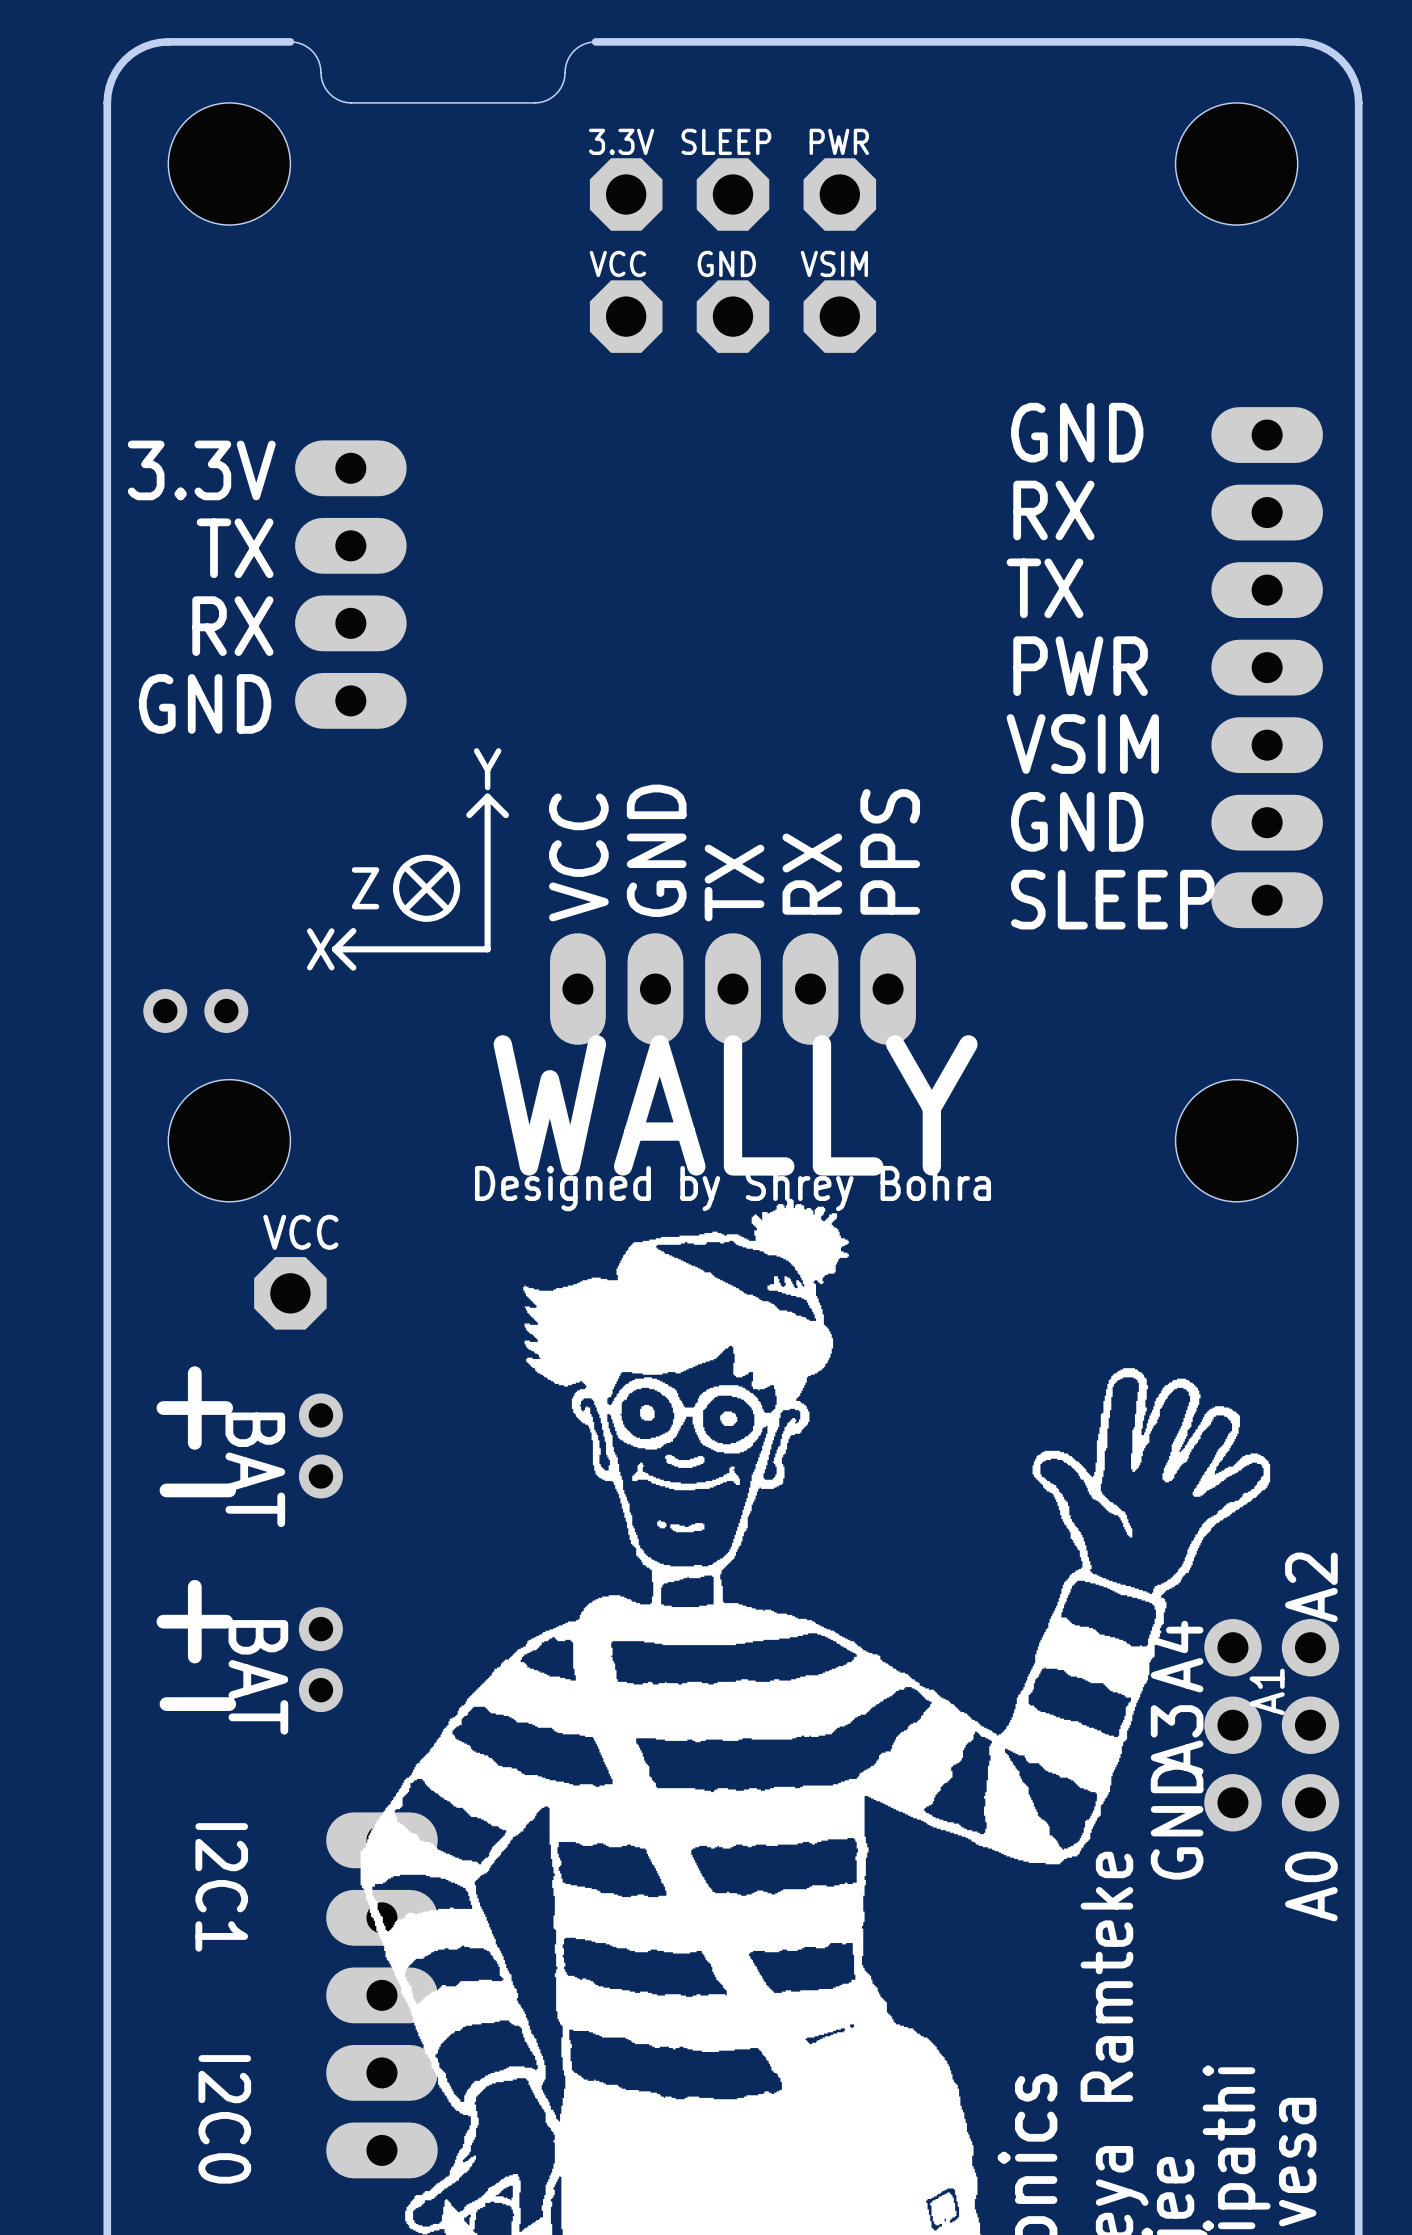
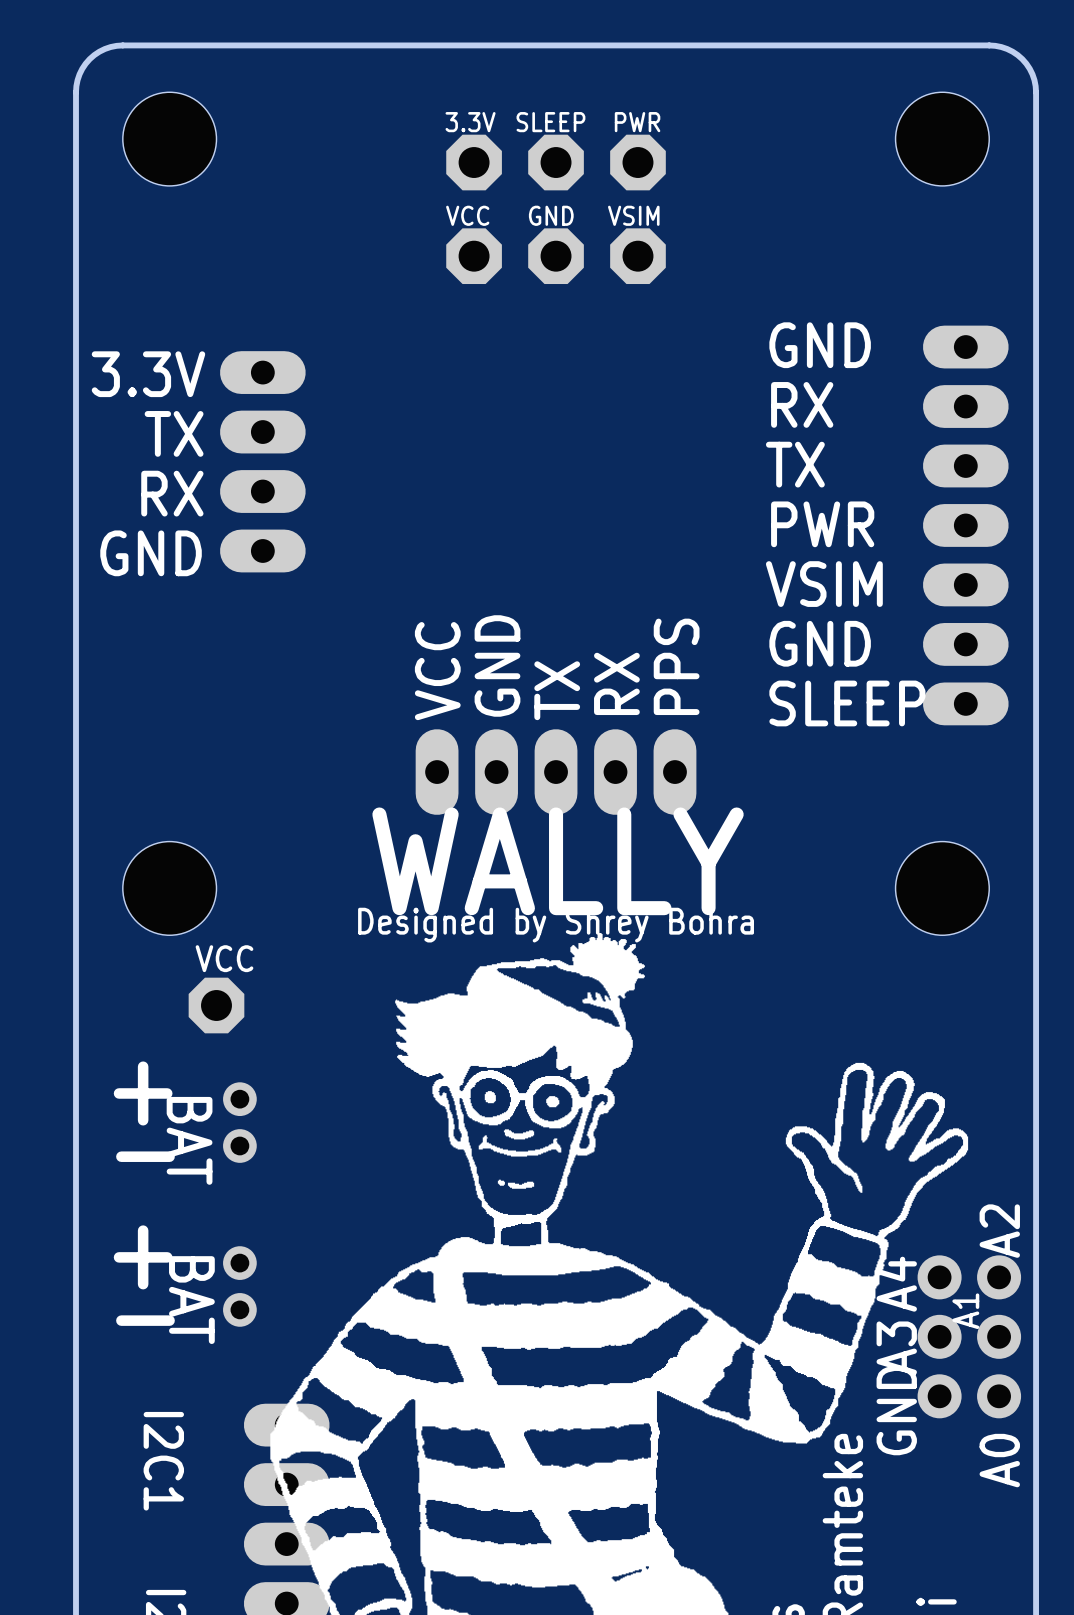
board edge: (595, 41) (583, 44) (571, 53) (566, 64) (562, 84) (556, 94) (546, 100) (534, 102) (343, 101) (332, 96) (325, 87) (318, 60) (311, 50) (302, 44) (290, 41) -> (450, 45) (216, 45)
text: Y (487, 769) -> none
line: (487, 796) (487, 949) (335, 949) -> none
line: (487, 796) (469, 815) -> none
line: (487, 796) (505, 815) -> none
drawing: [393, 854, 461, 922] -> none
line: (405, 866) (447, 909) -> none
line: (447, 866) (405, 909) -> none
text: Z (365, 888) -> none
line: (353, 931) (335, 949) -> none
text: X (320, 949) -> none
line: (335, 949) (353, 967) -> none
part: (195, 1011) -> none

